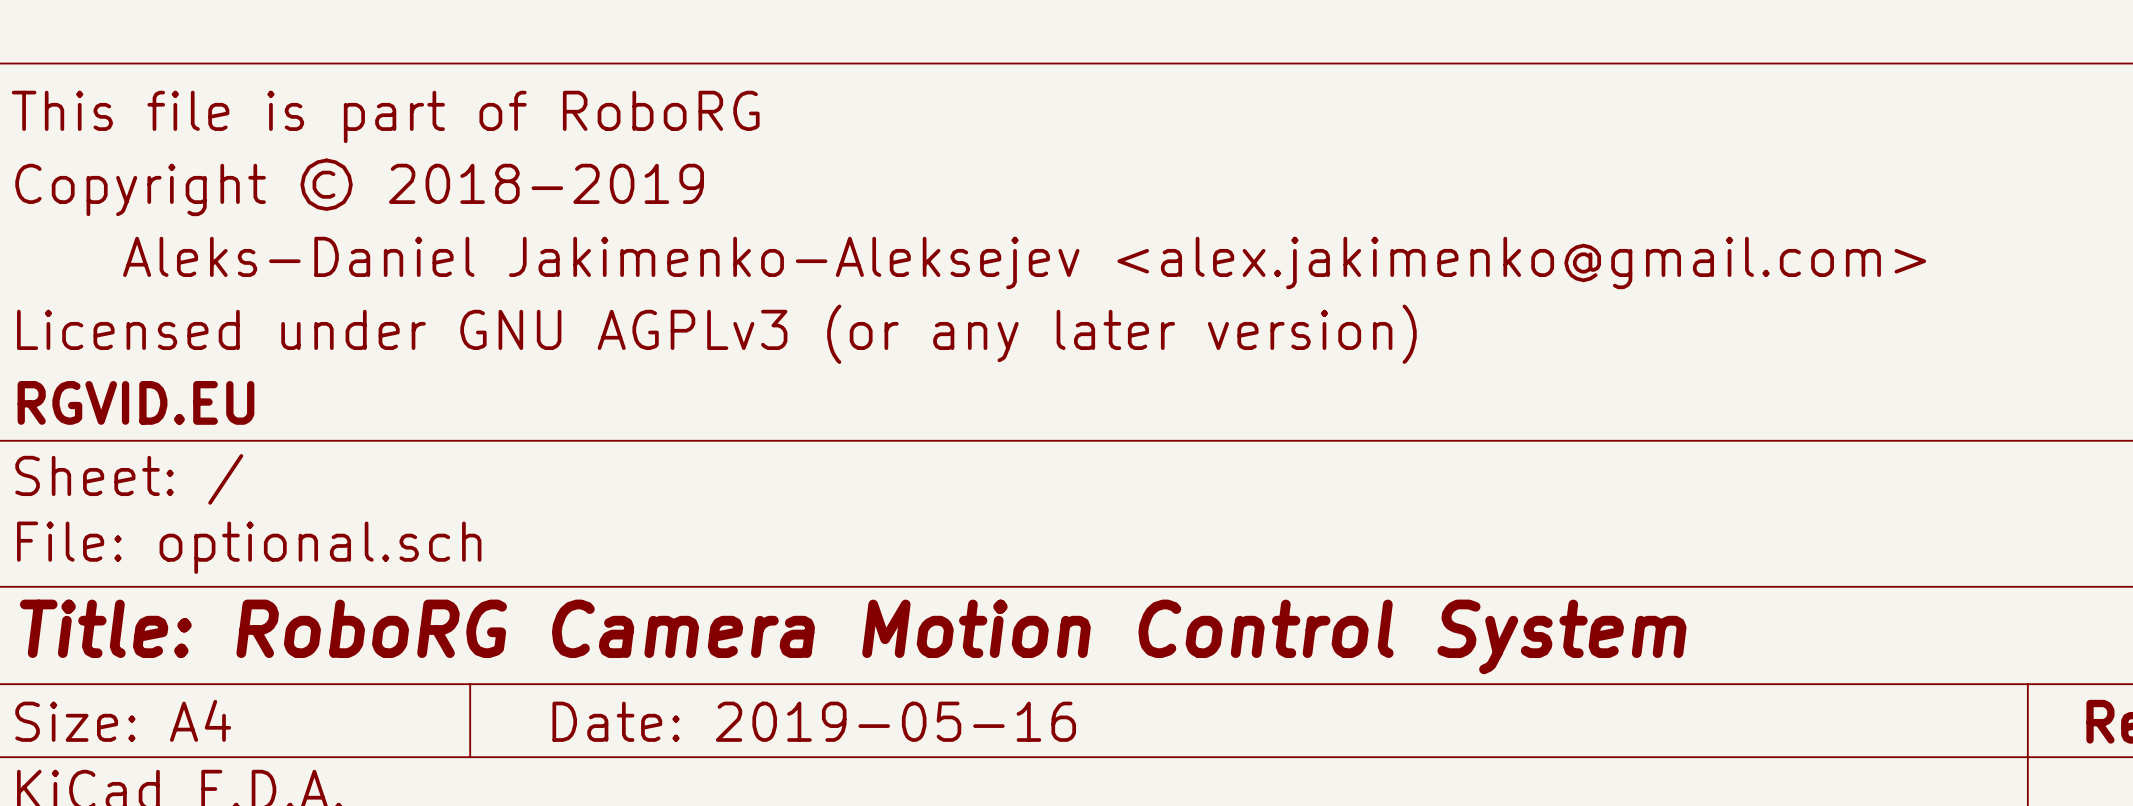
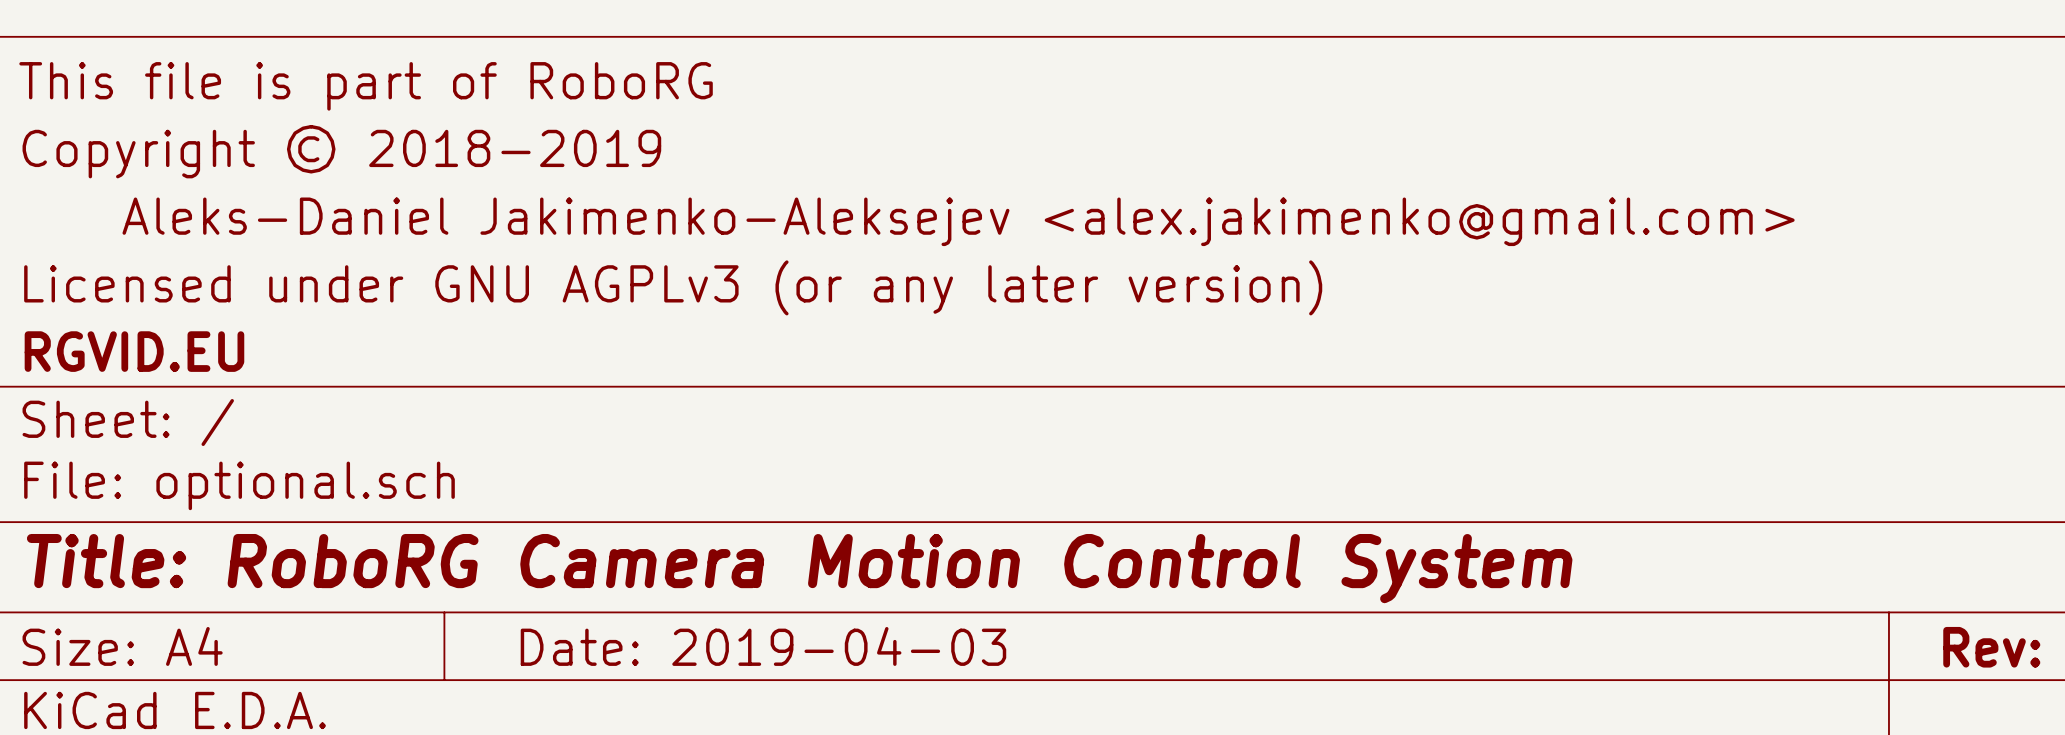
title block: Date: 2019-05-16 (814, 721) -> Date: 2019-04-03 (763, 646)

